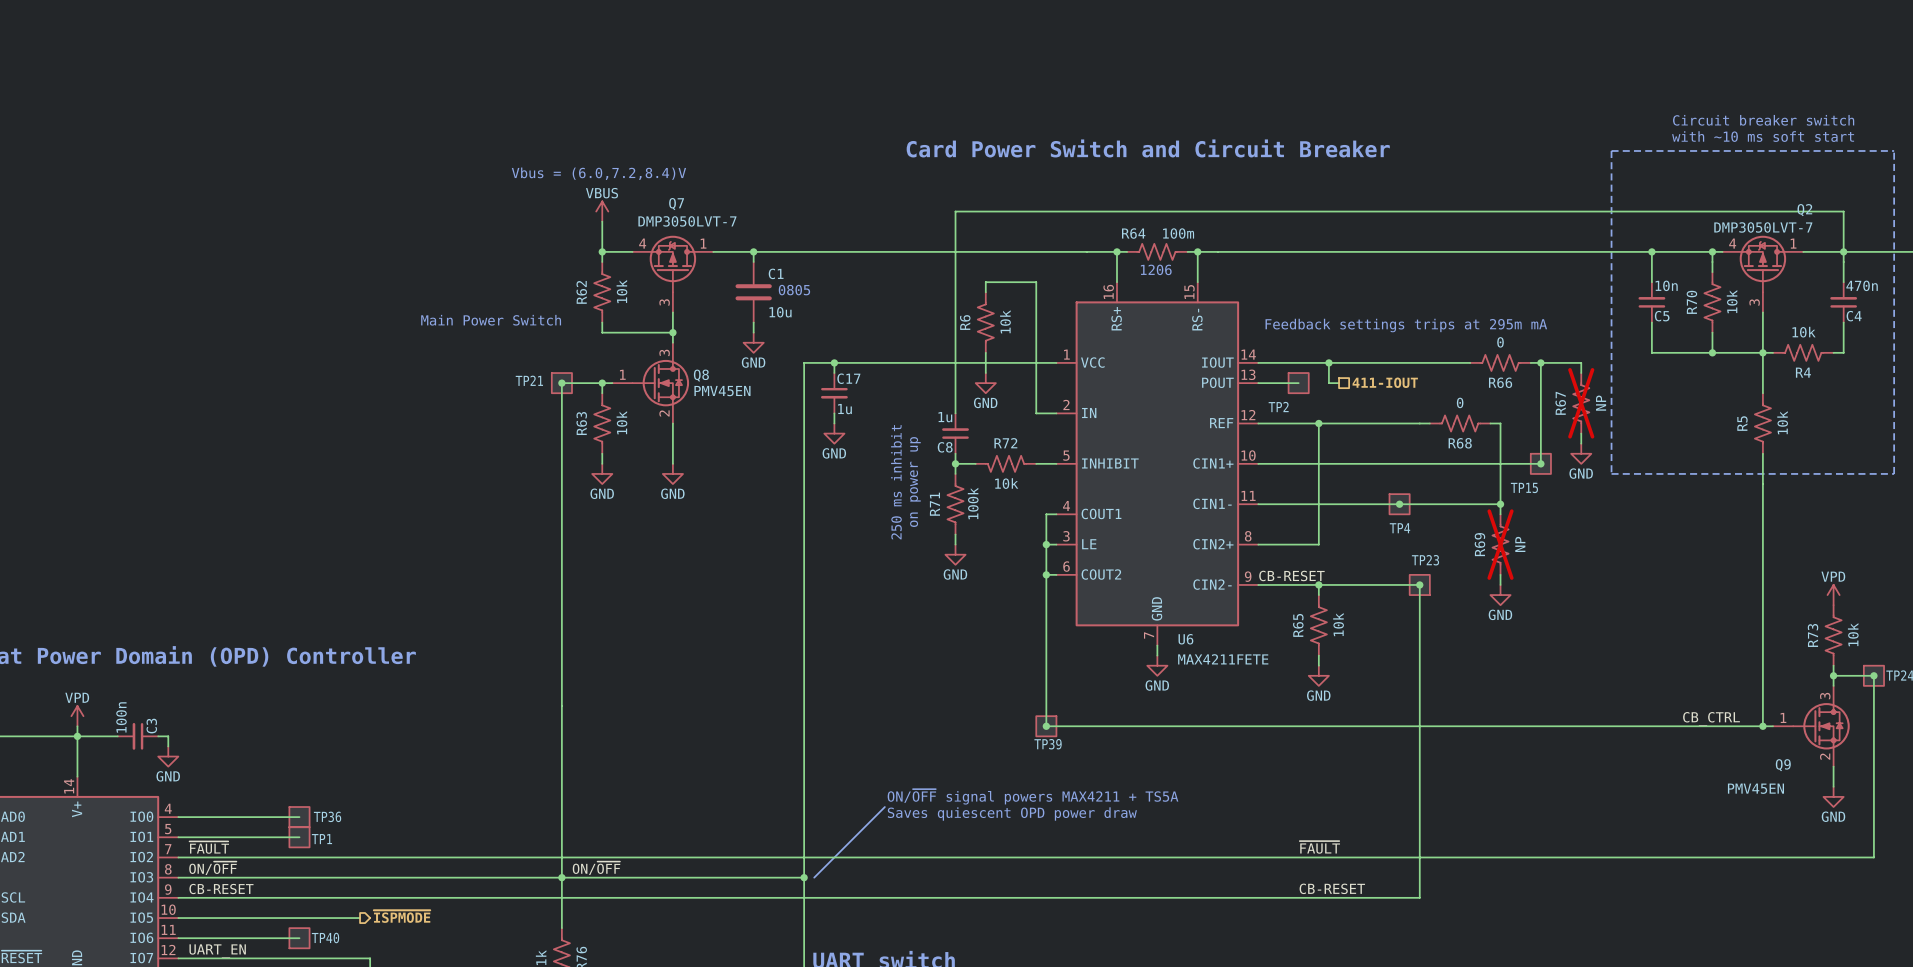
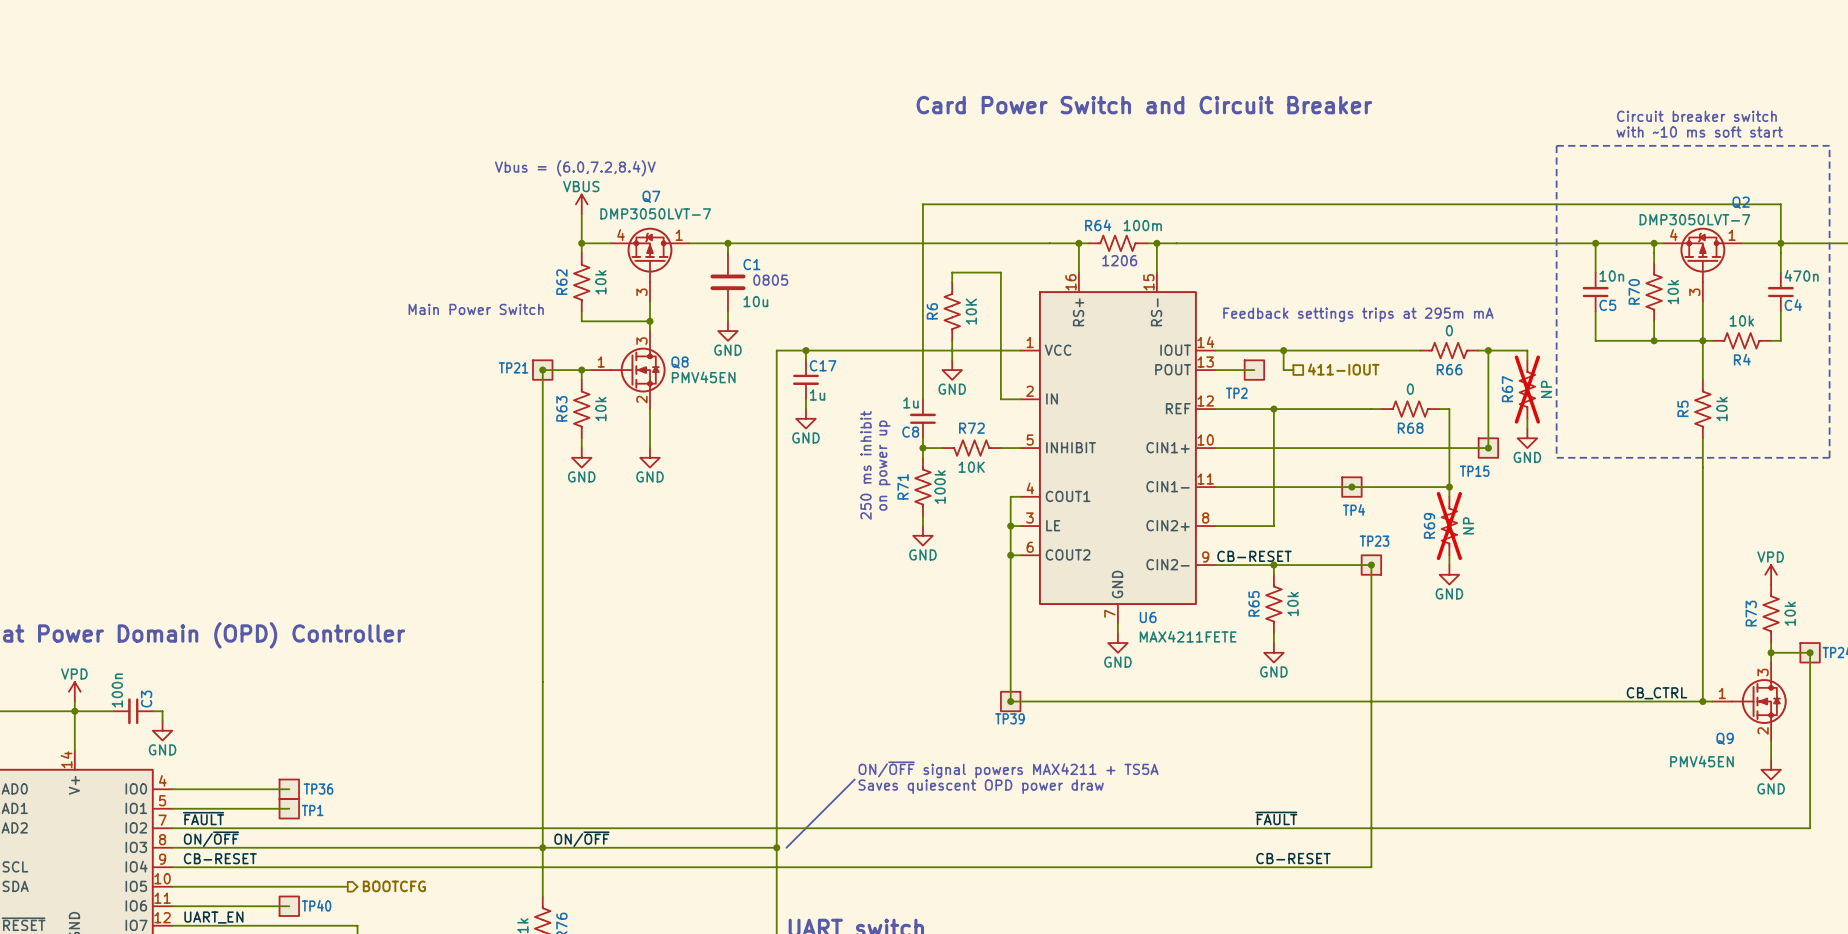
text position: Card Power Switch and Circuit Breaker (1148, 148) -> Card Power Switch and Circuit Breaker (1144, 105)
R6 value: 10k (1005, 321) -> 10K (971, 311)
R72 value: 10k (1006, 483) -> 10K (971, 467)
hierarchical label: ~{ISPMODE} (402, 916) -> BOOTCFG (394, 886)

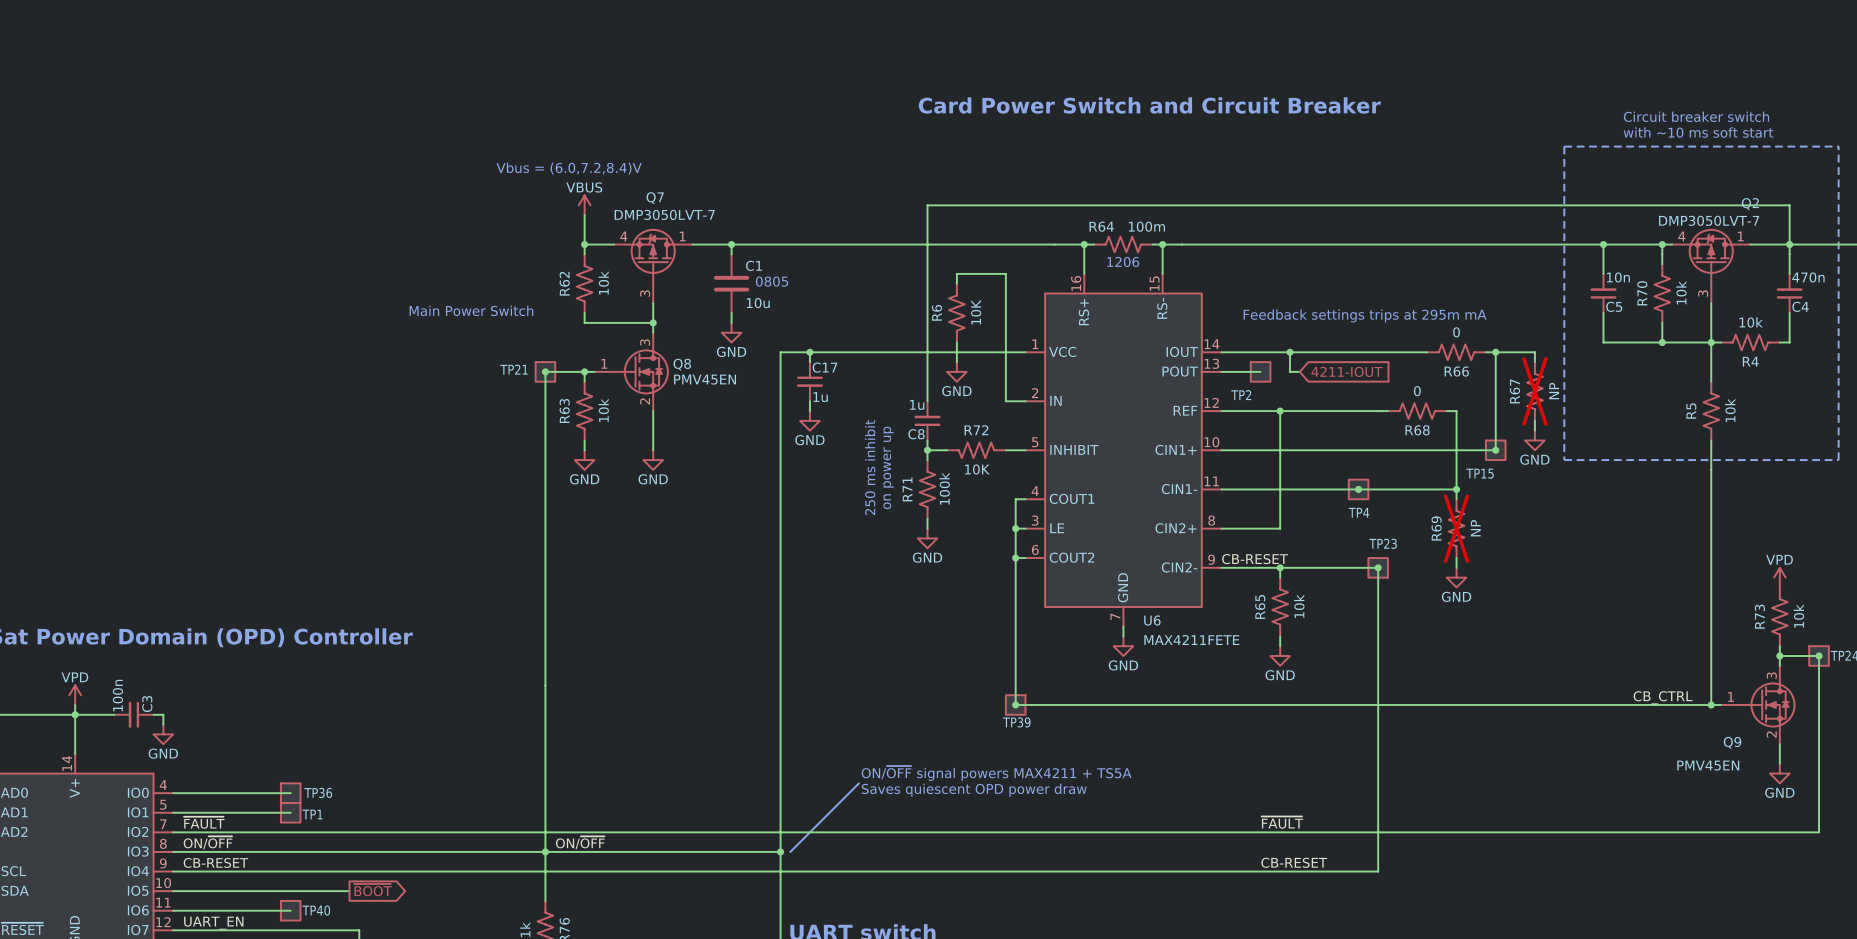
hierarchical label: 411-IOUT (1343, 369) -> none
global label: none -> 4211-IOUT (1346, 371)
global label: none -> ~{BOOT} (372, 890)
hierarchical label: BOOTCFG (394, 886) -> none

